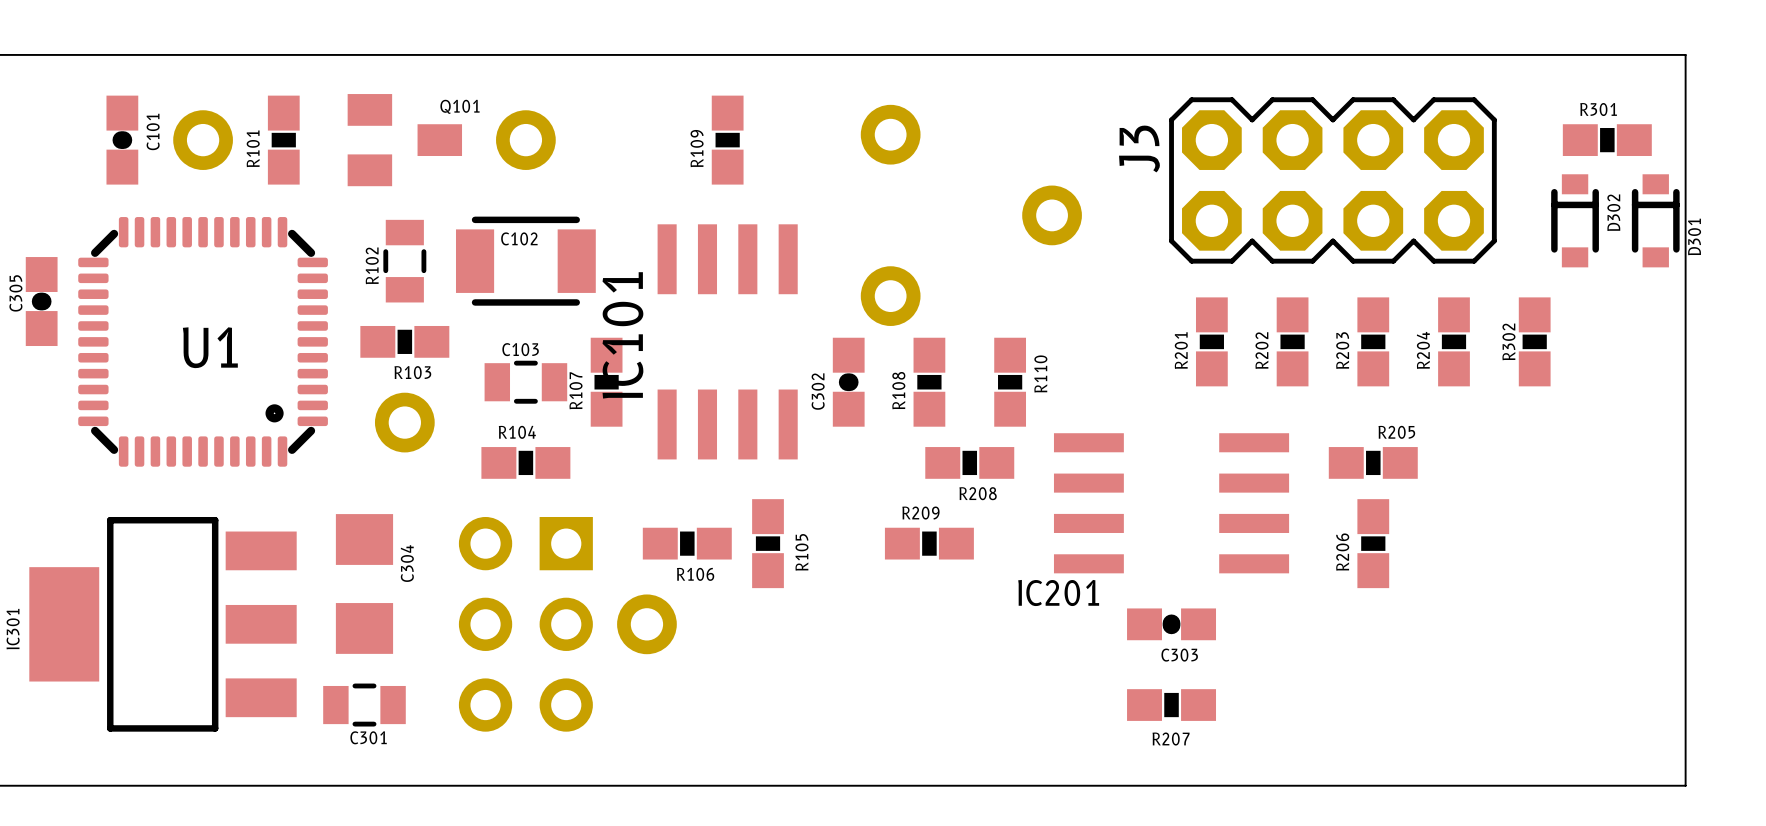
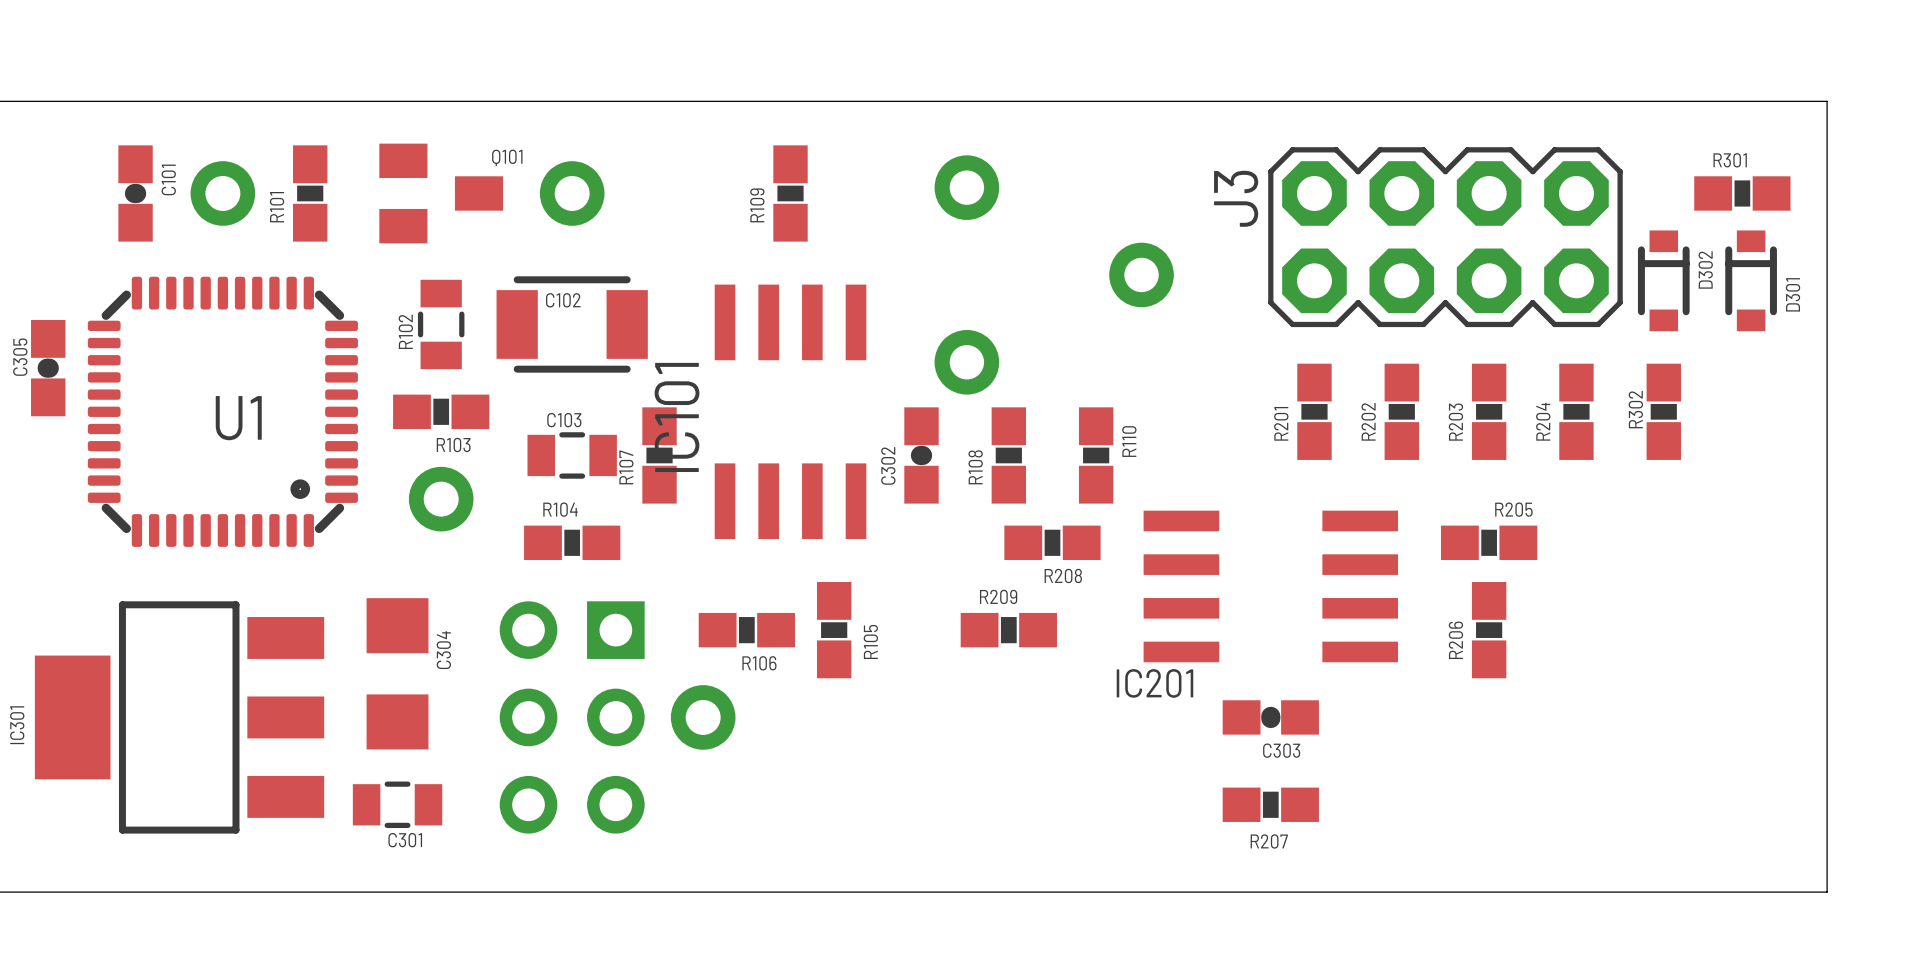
D302 position: (1575, 220) -> (1663, 280)
D301 position: (1655, 220) -> (1751, 280)

